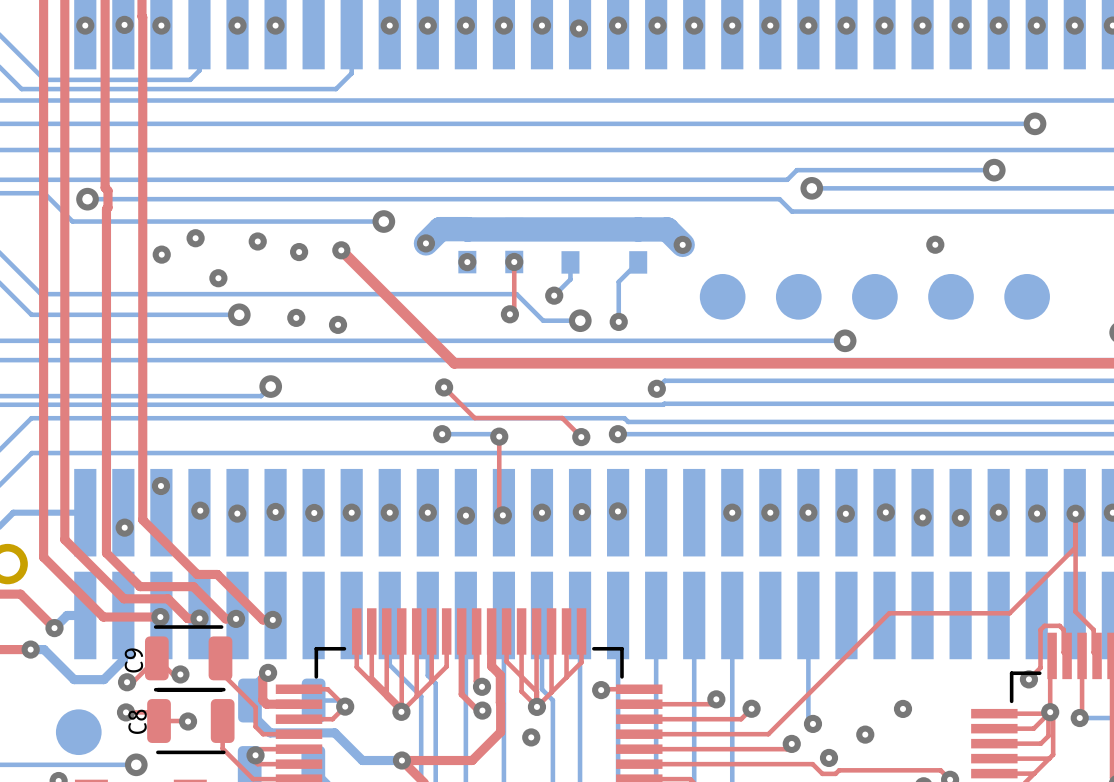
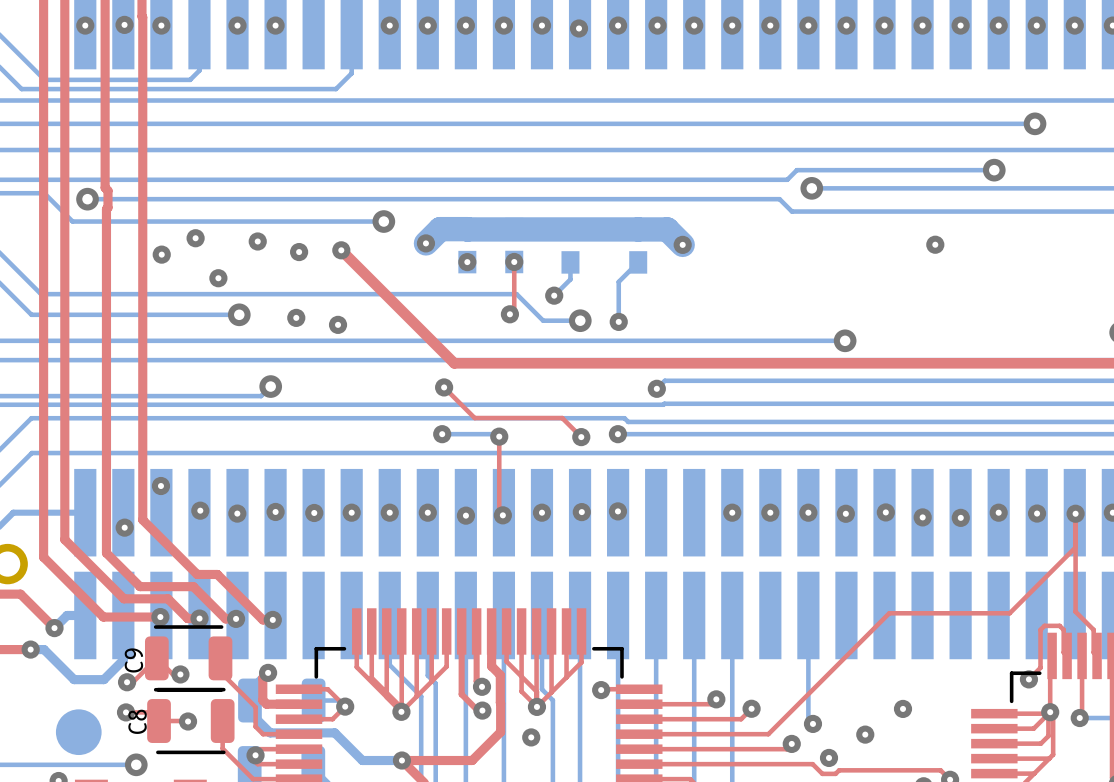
part: (722, 296) -> none
part: (798, 296) -> none
part: (874, 296) -> none
part: (951, 296) -> none
part: (1027, 296) -> none

